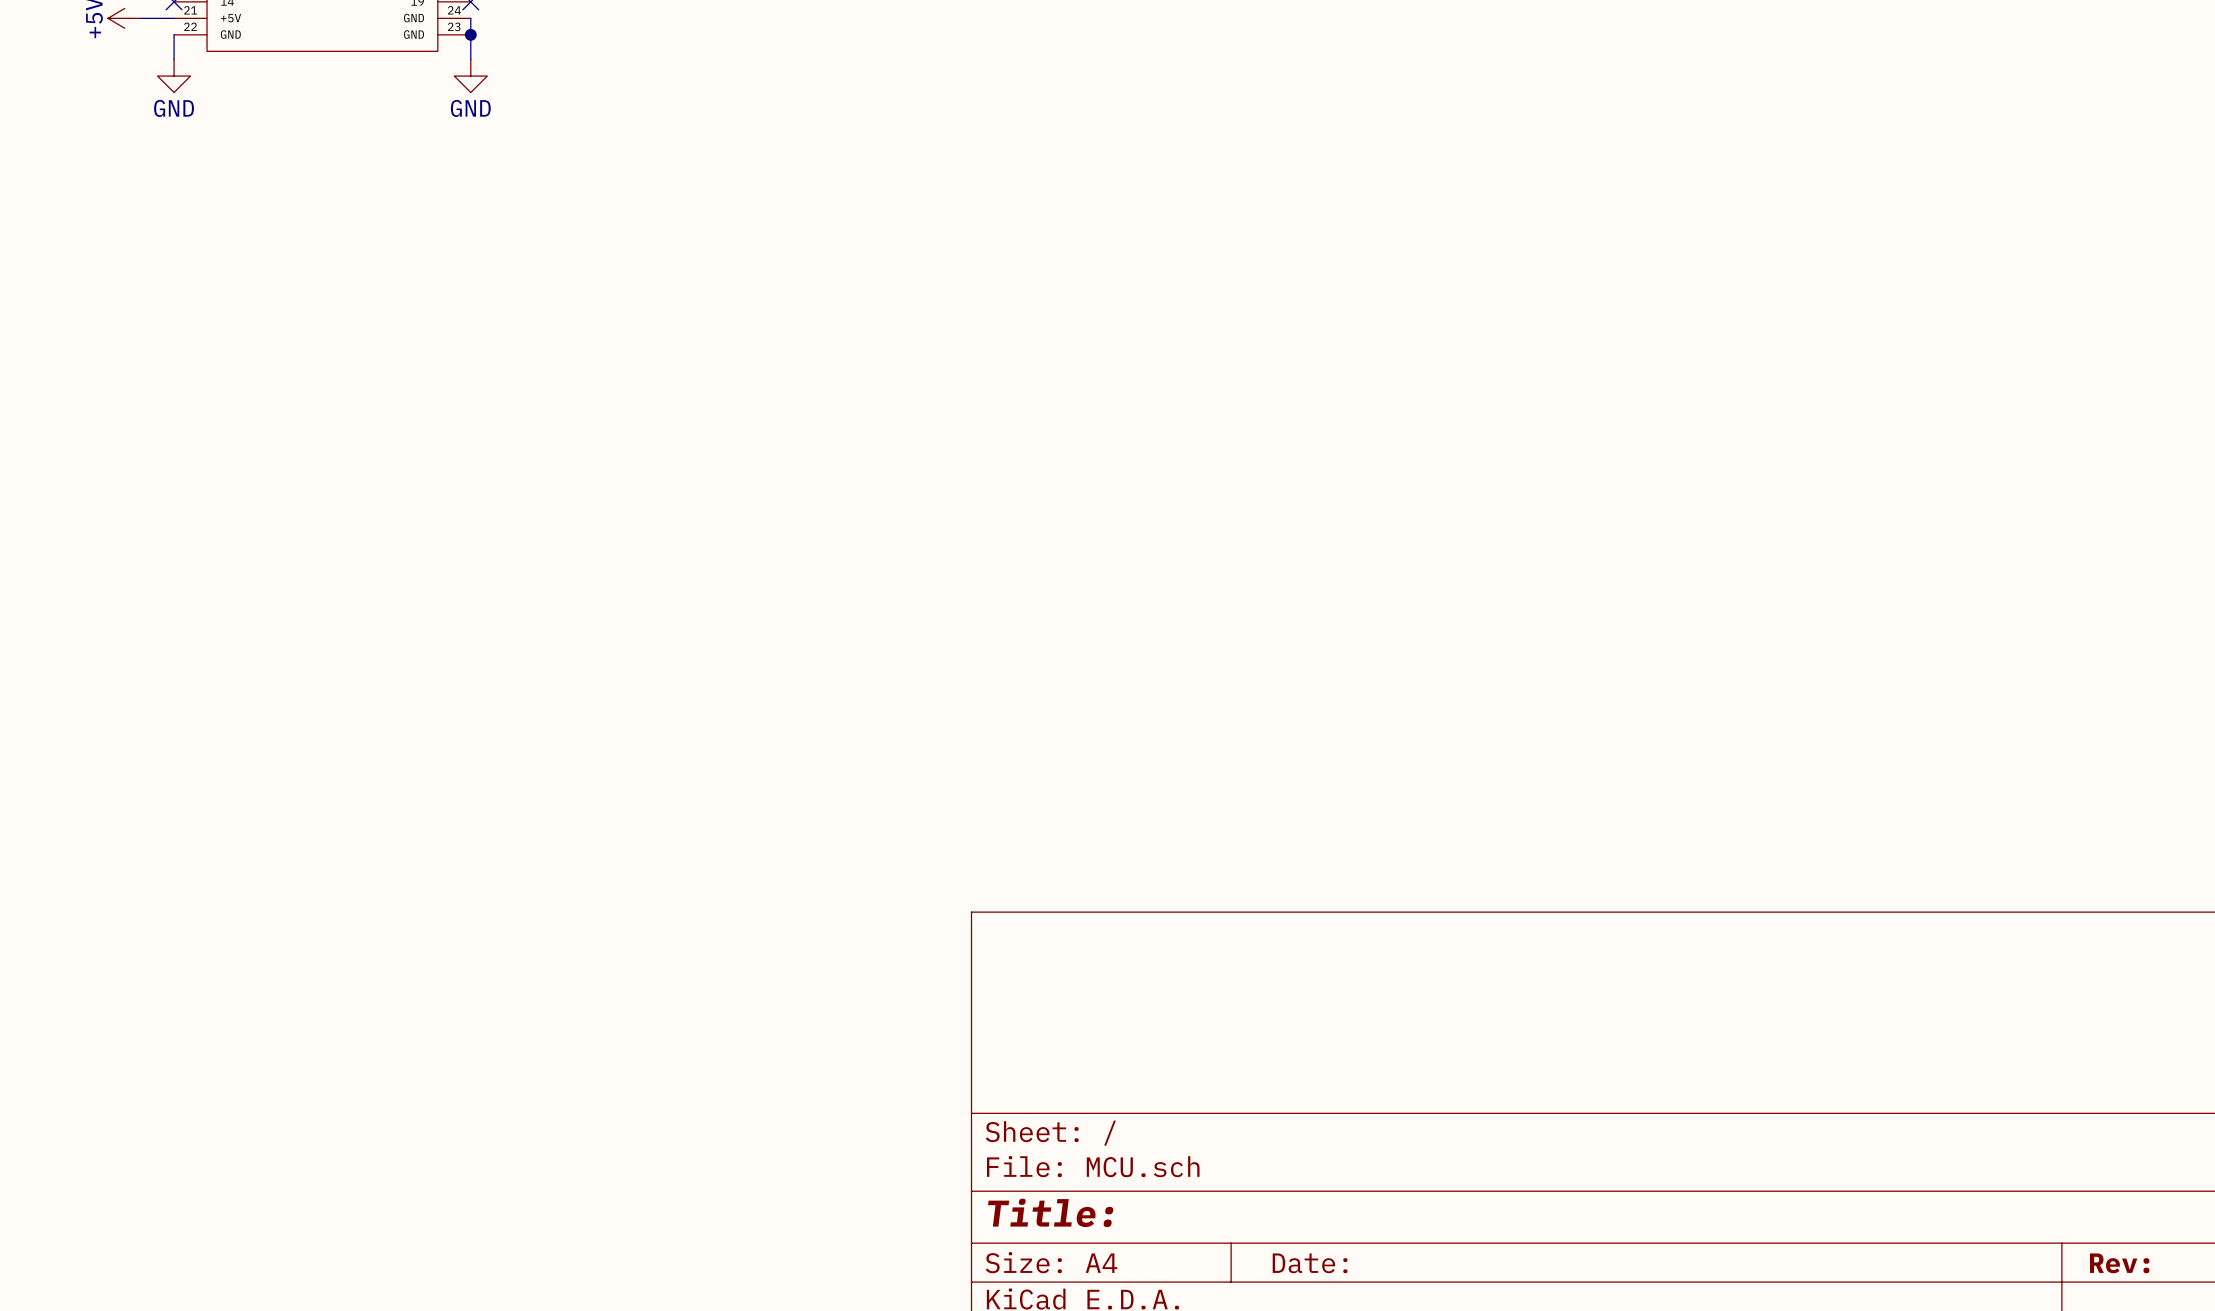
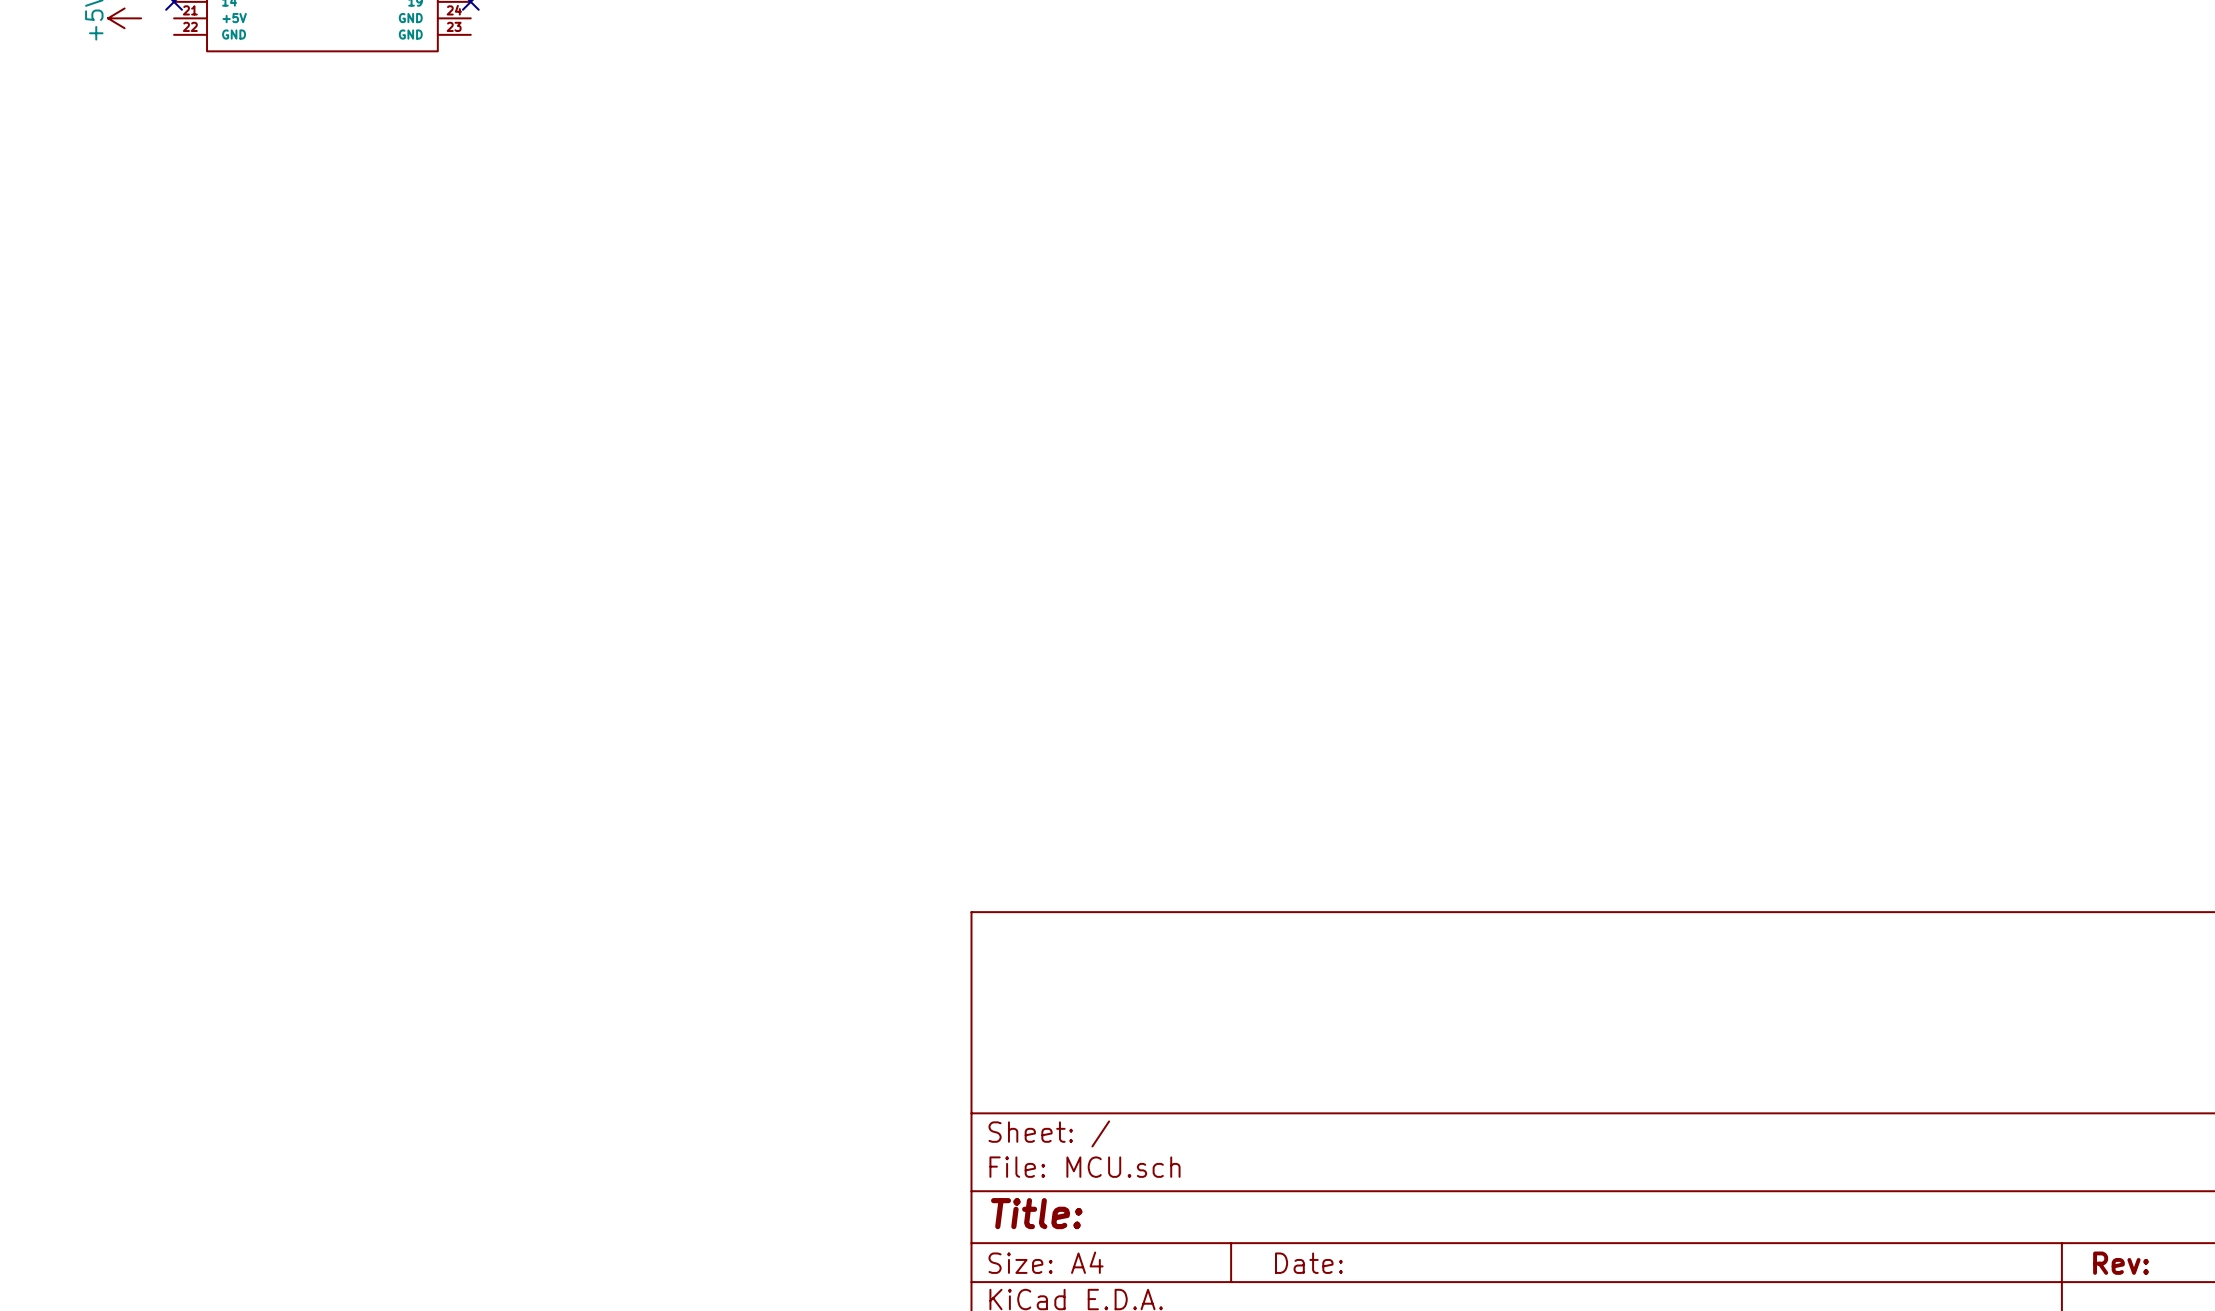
wire: (141, 18) (174, 18) -> none
wire: (470, 18) (470, 59) -> none
wire: (174, 34) (174, 59) -> none
junction: (470, 34) -> none
power symbol: GND (174, 76) -> none
power symbol: GND (470, 76) -> none

